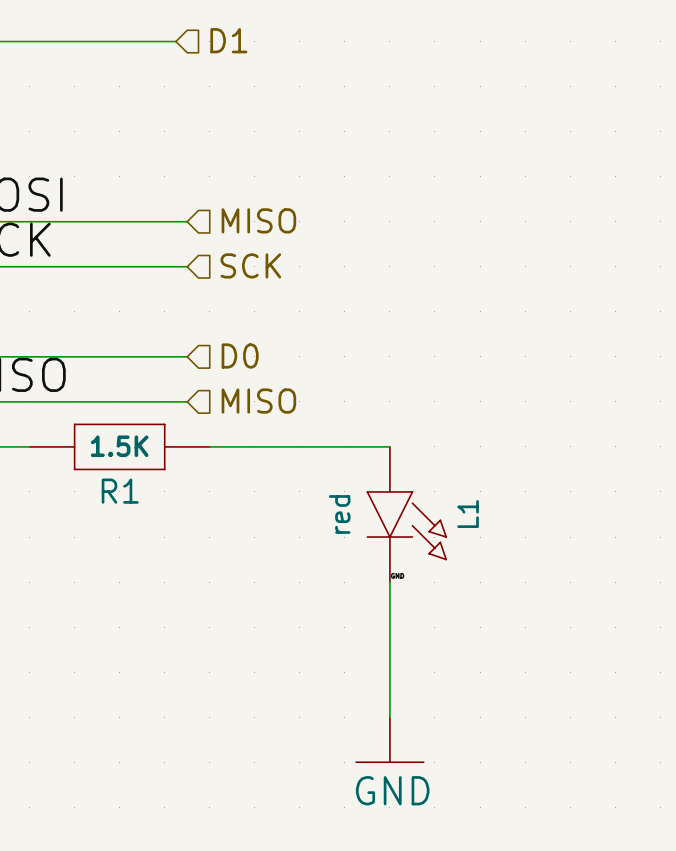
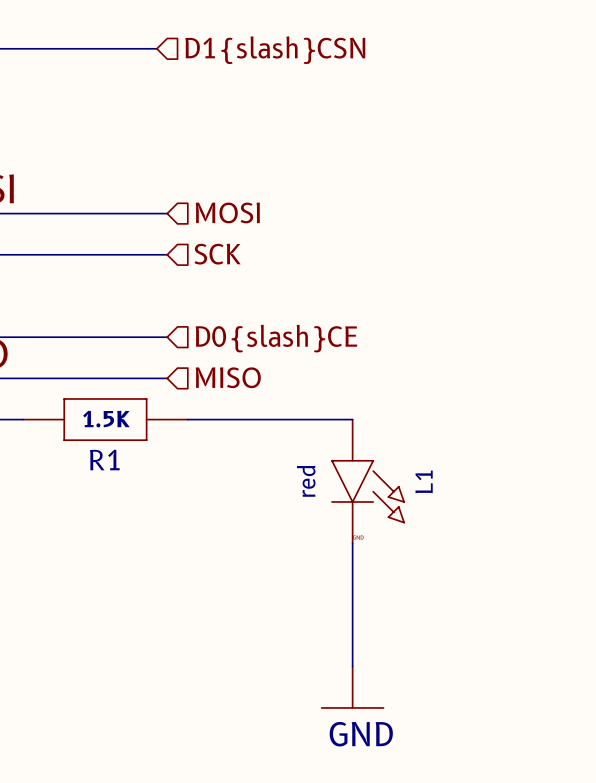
hierarchical label: D1 (228, 40) -> D1{slash}CSN (275, 50)
hierarchical label: MISO (258, 220) -> MOSI (227, 212)
hierarchical label: D0 (240, 356) -> D0{slash}CE (276, 338)

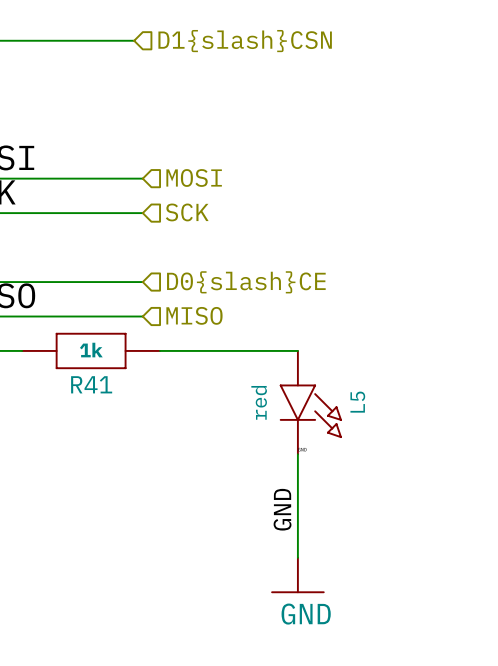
R1 value: 1.5K (106, 419) -> 1k (91, 350)
R1 name: R1 (104, 460) -> R41 (91, 384)
L1 name: L1 (424, 481) -> L5 (357, 402)
label: none -> GND (282, 509)

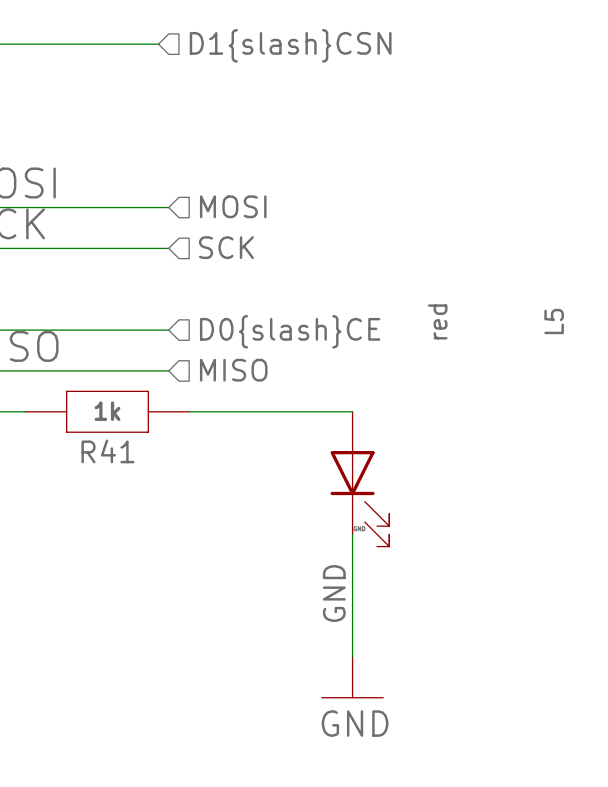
L5 symbol: [280, 350, 341, 455] -> [330, 411, 390, 547]
L5 value position: red (259, 402) -> red (437, 321)
L5 name position: L5 (357, 402) -> L5 (554, 321)

